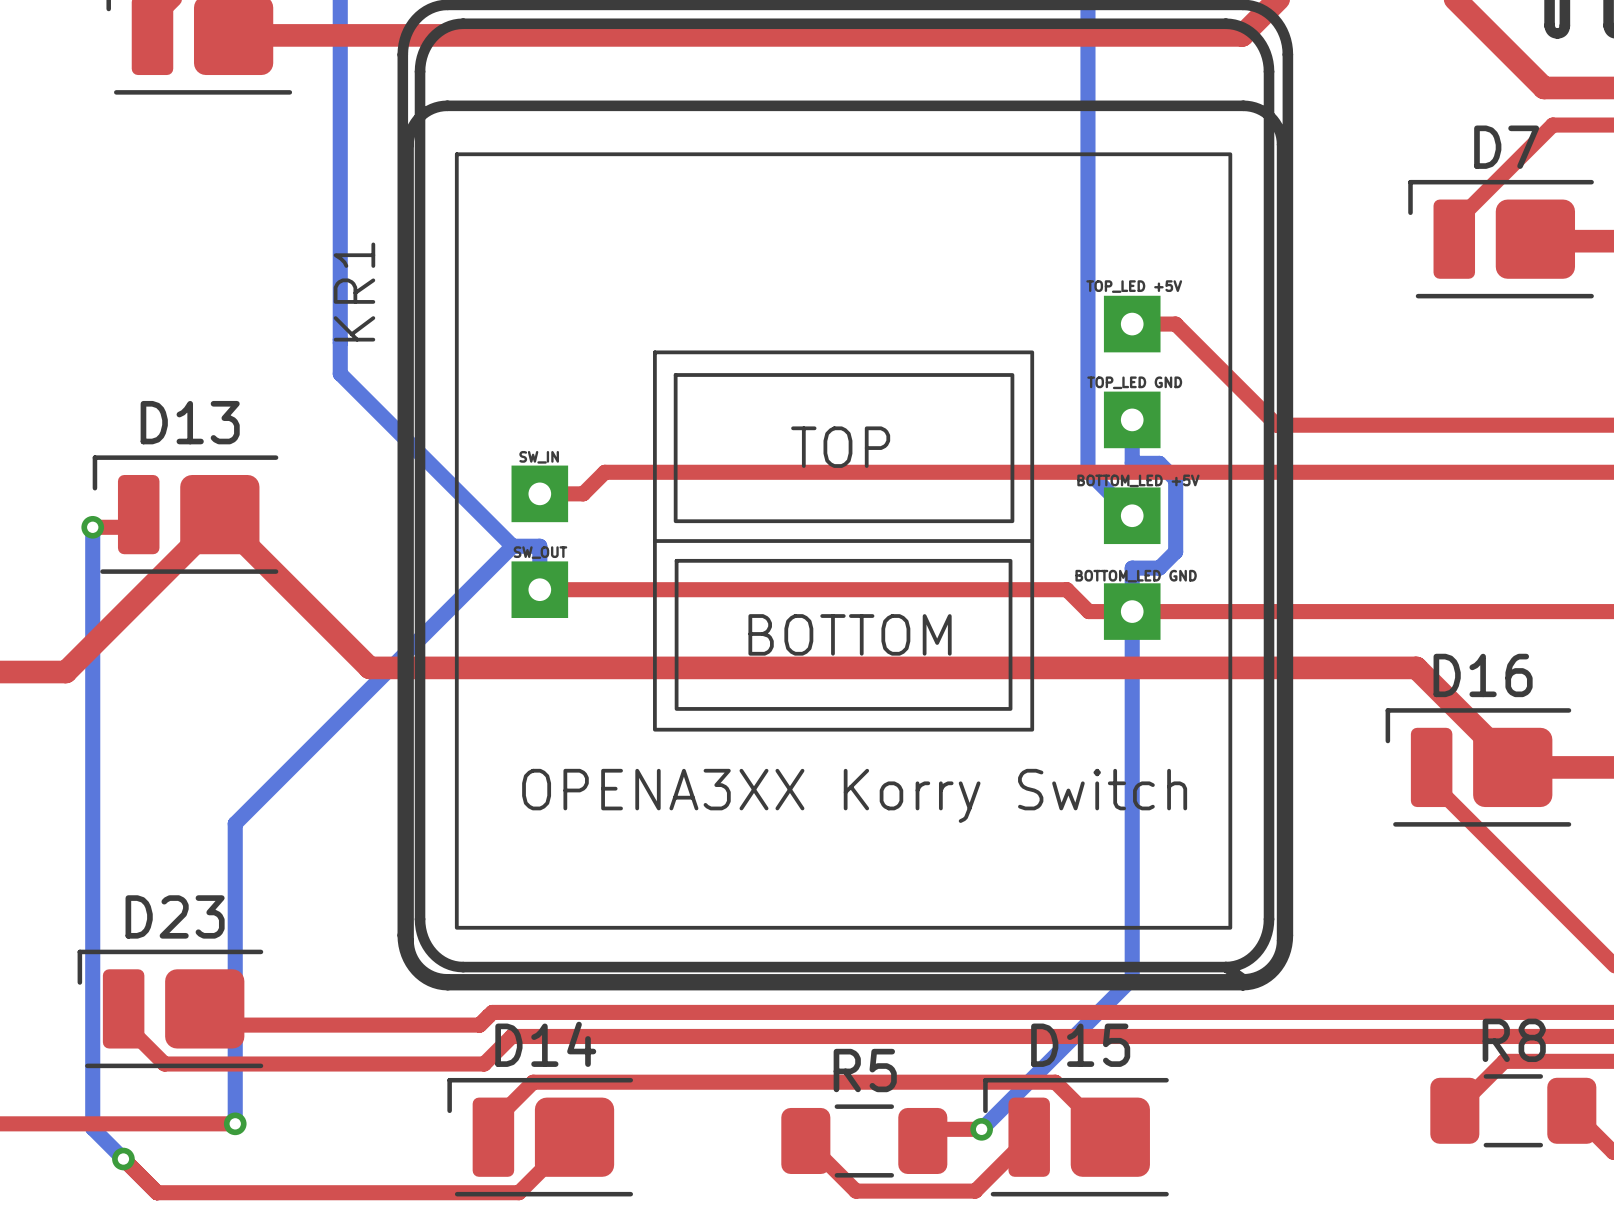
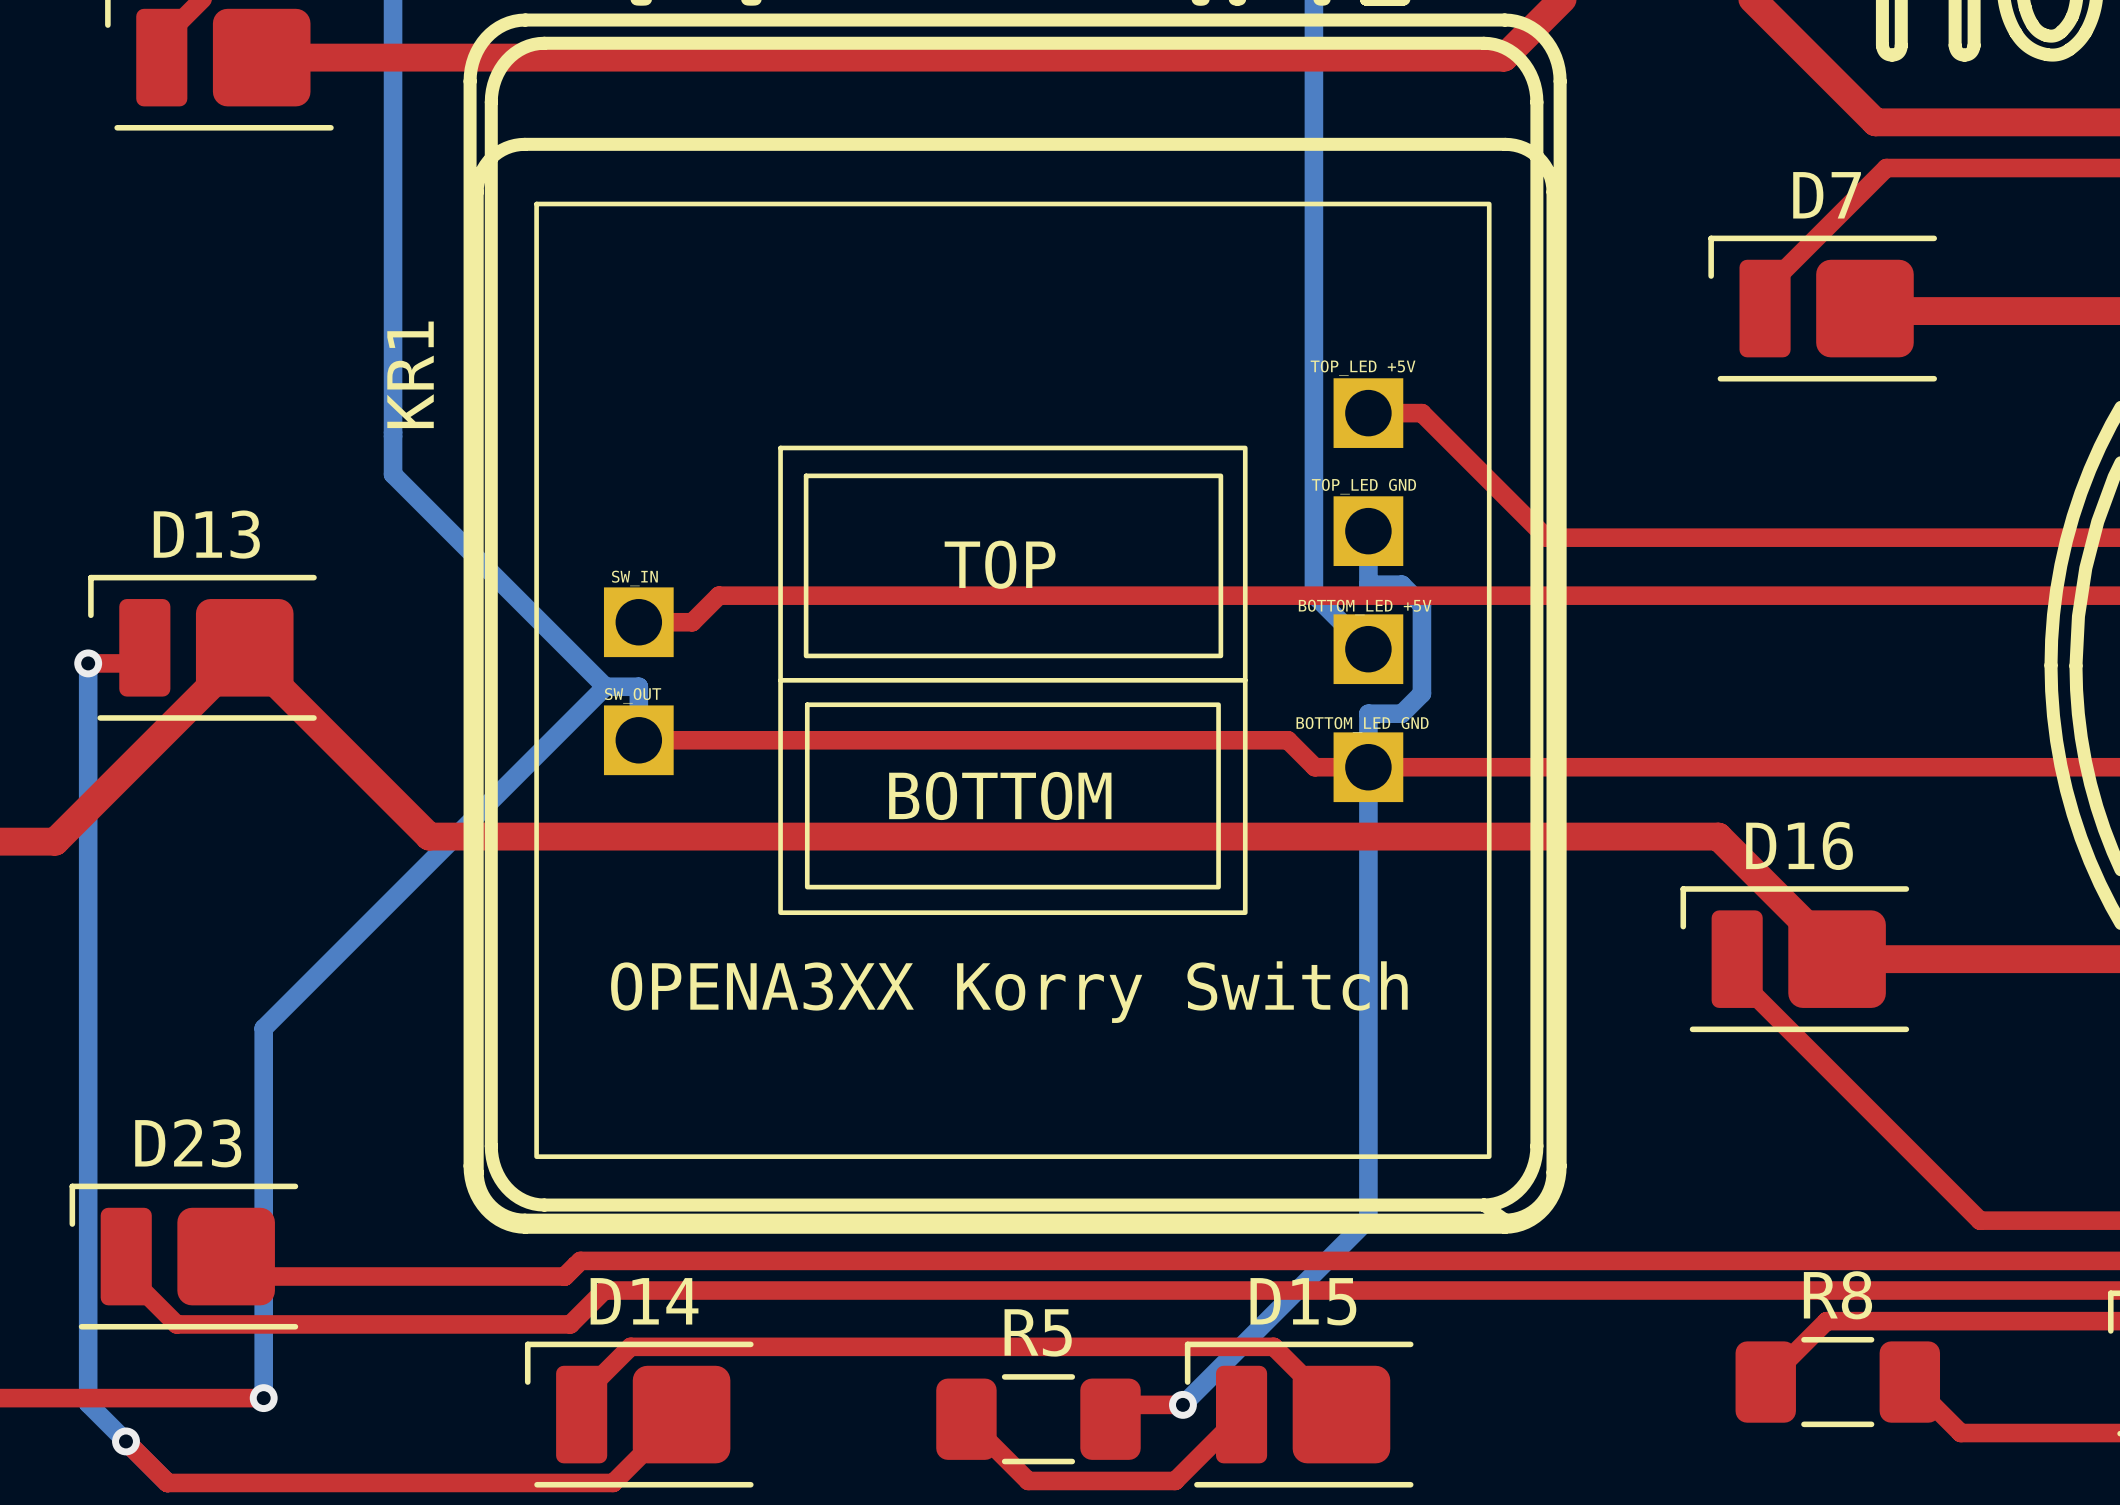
KR1 footprint: [454, 152, 1233, 930] -> [534, 201, 1492, 1159]

